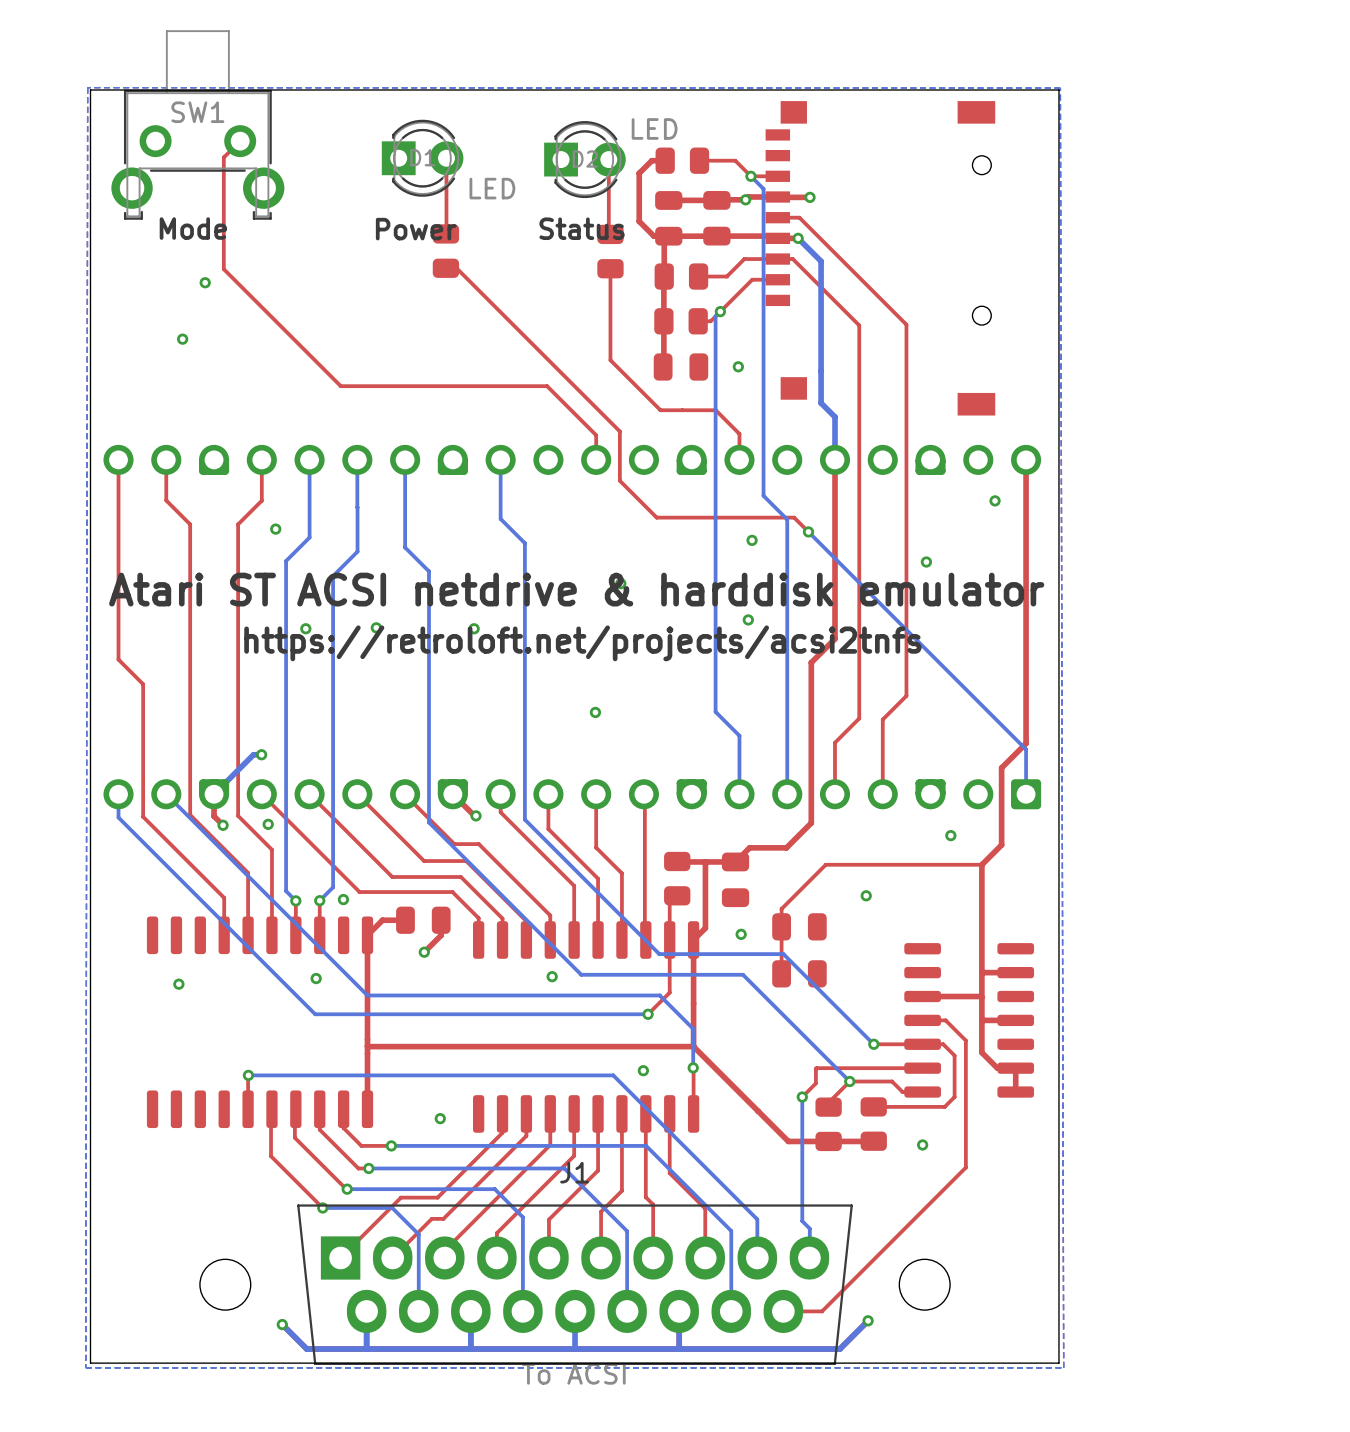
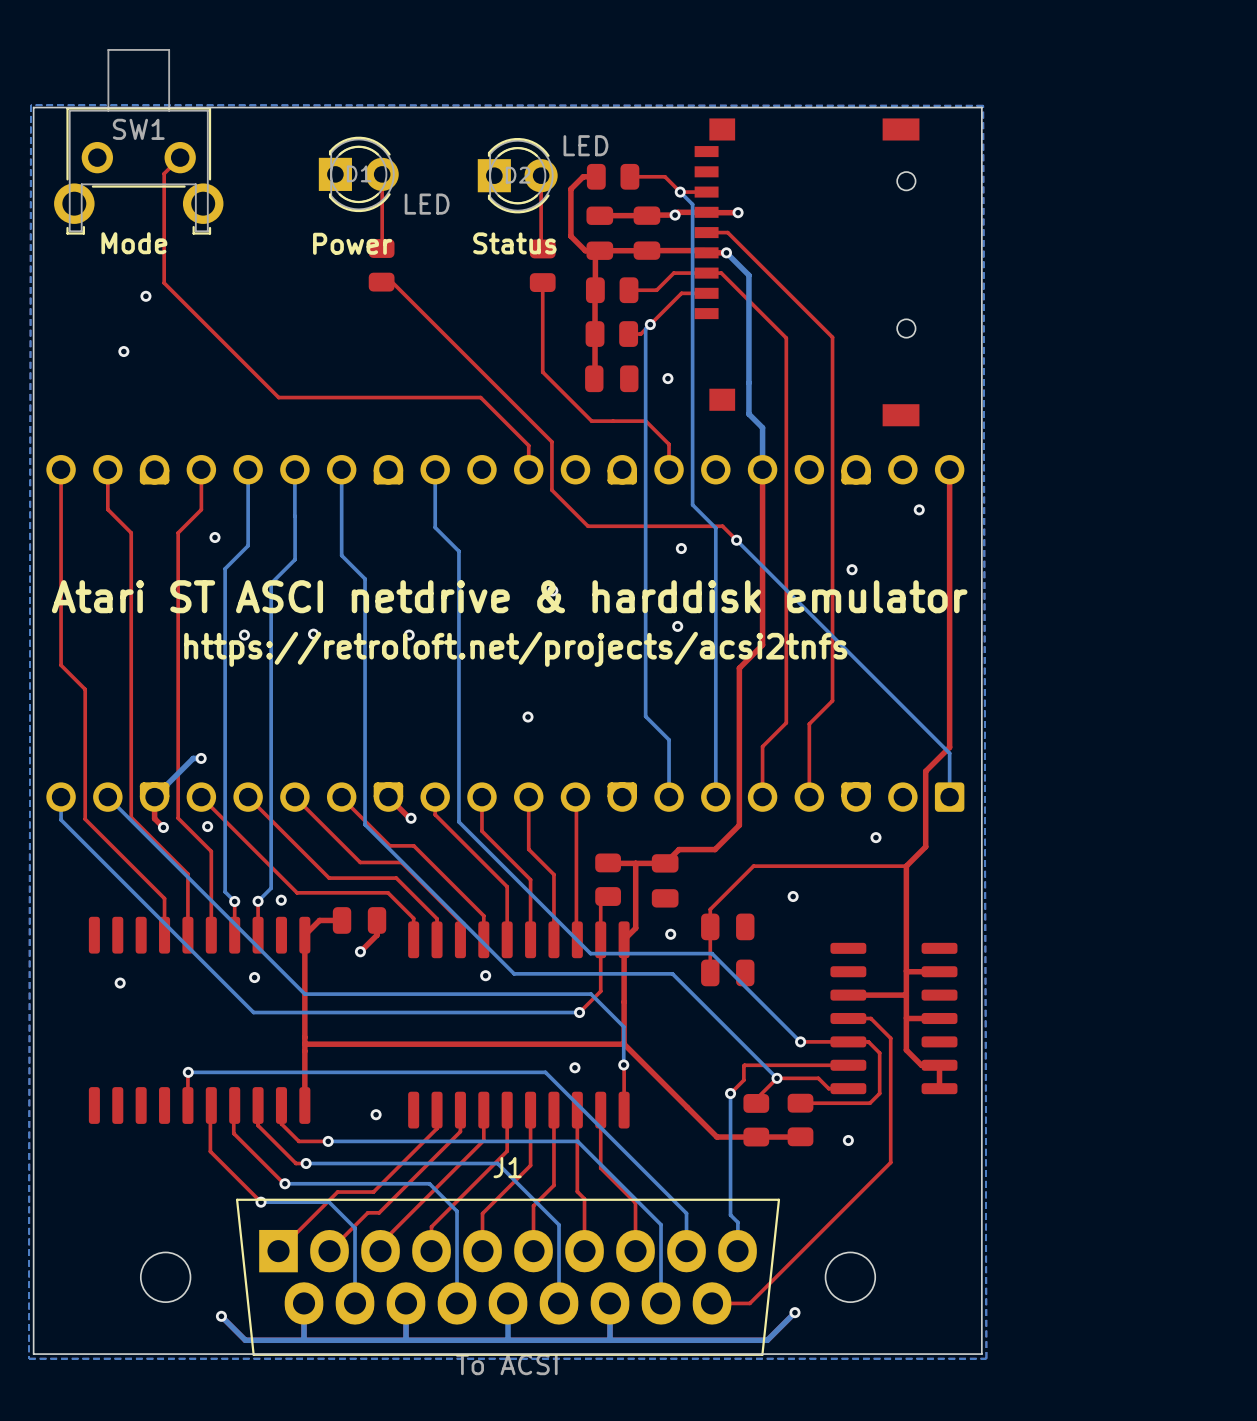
text: Atari ST ACSI netdrive & harddisk emulator (576, 589) -> Atari ST ASCI netdrive & harddisk emulator (509, 596)

